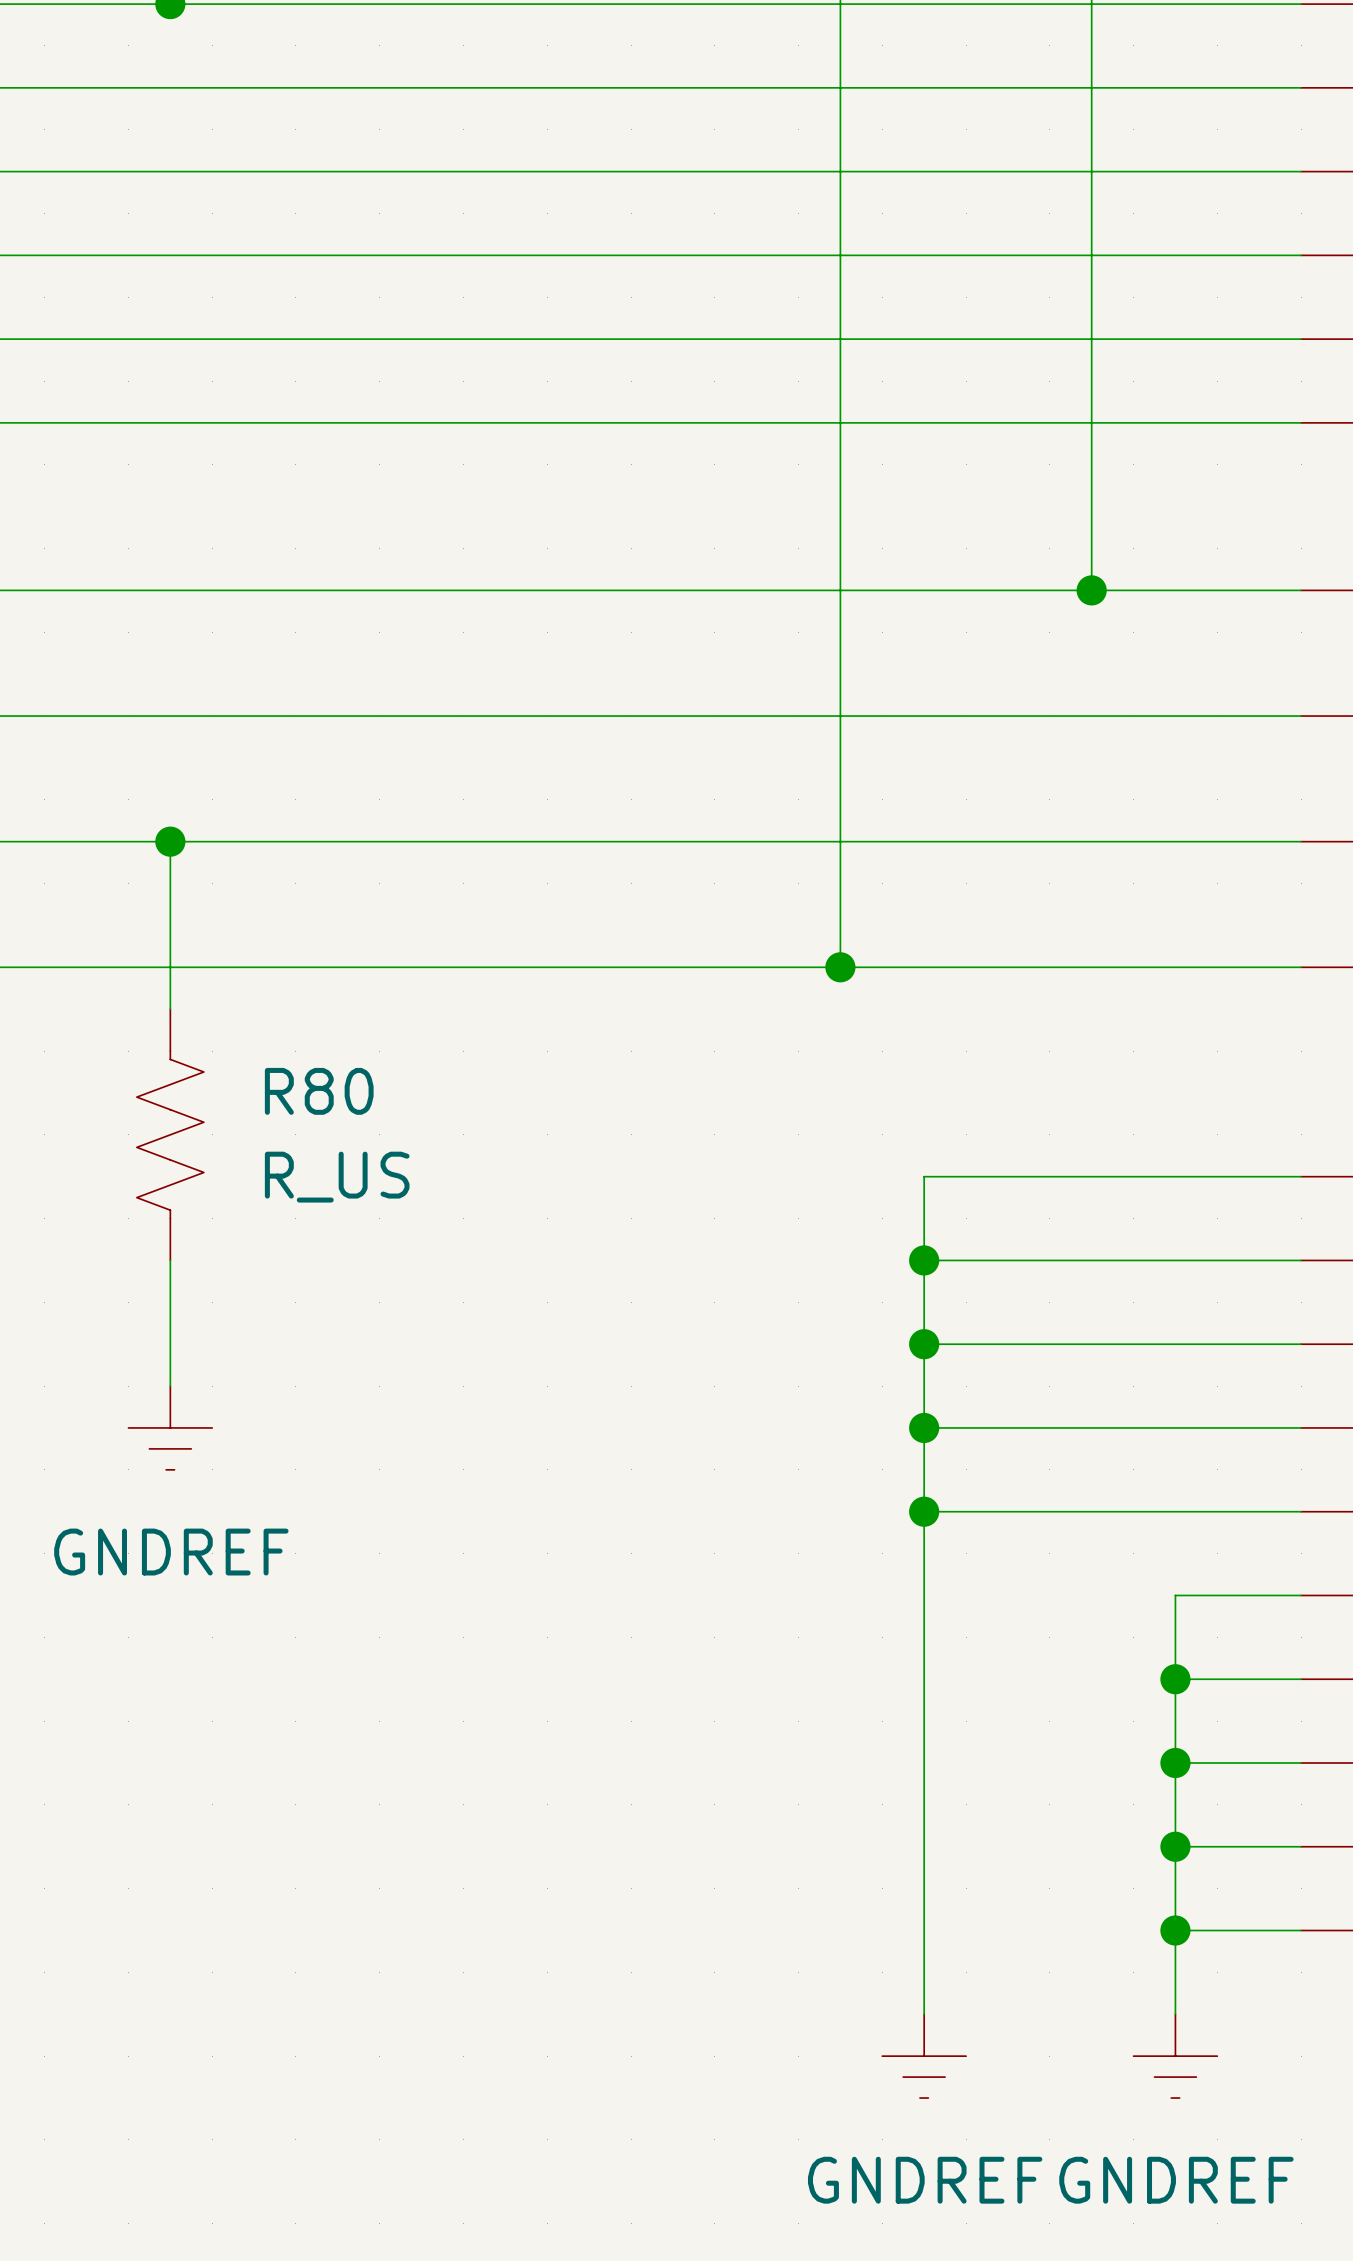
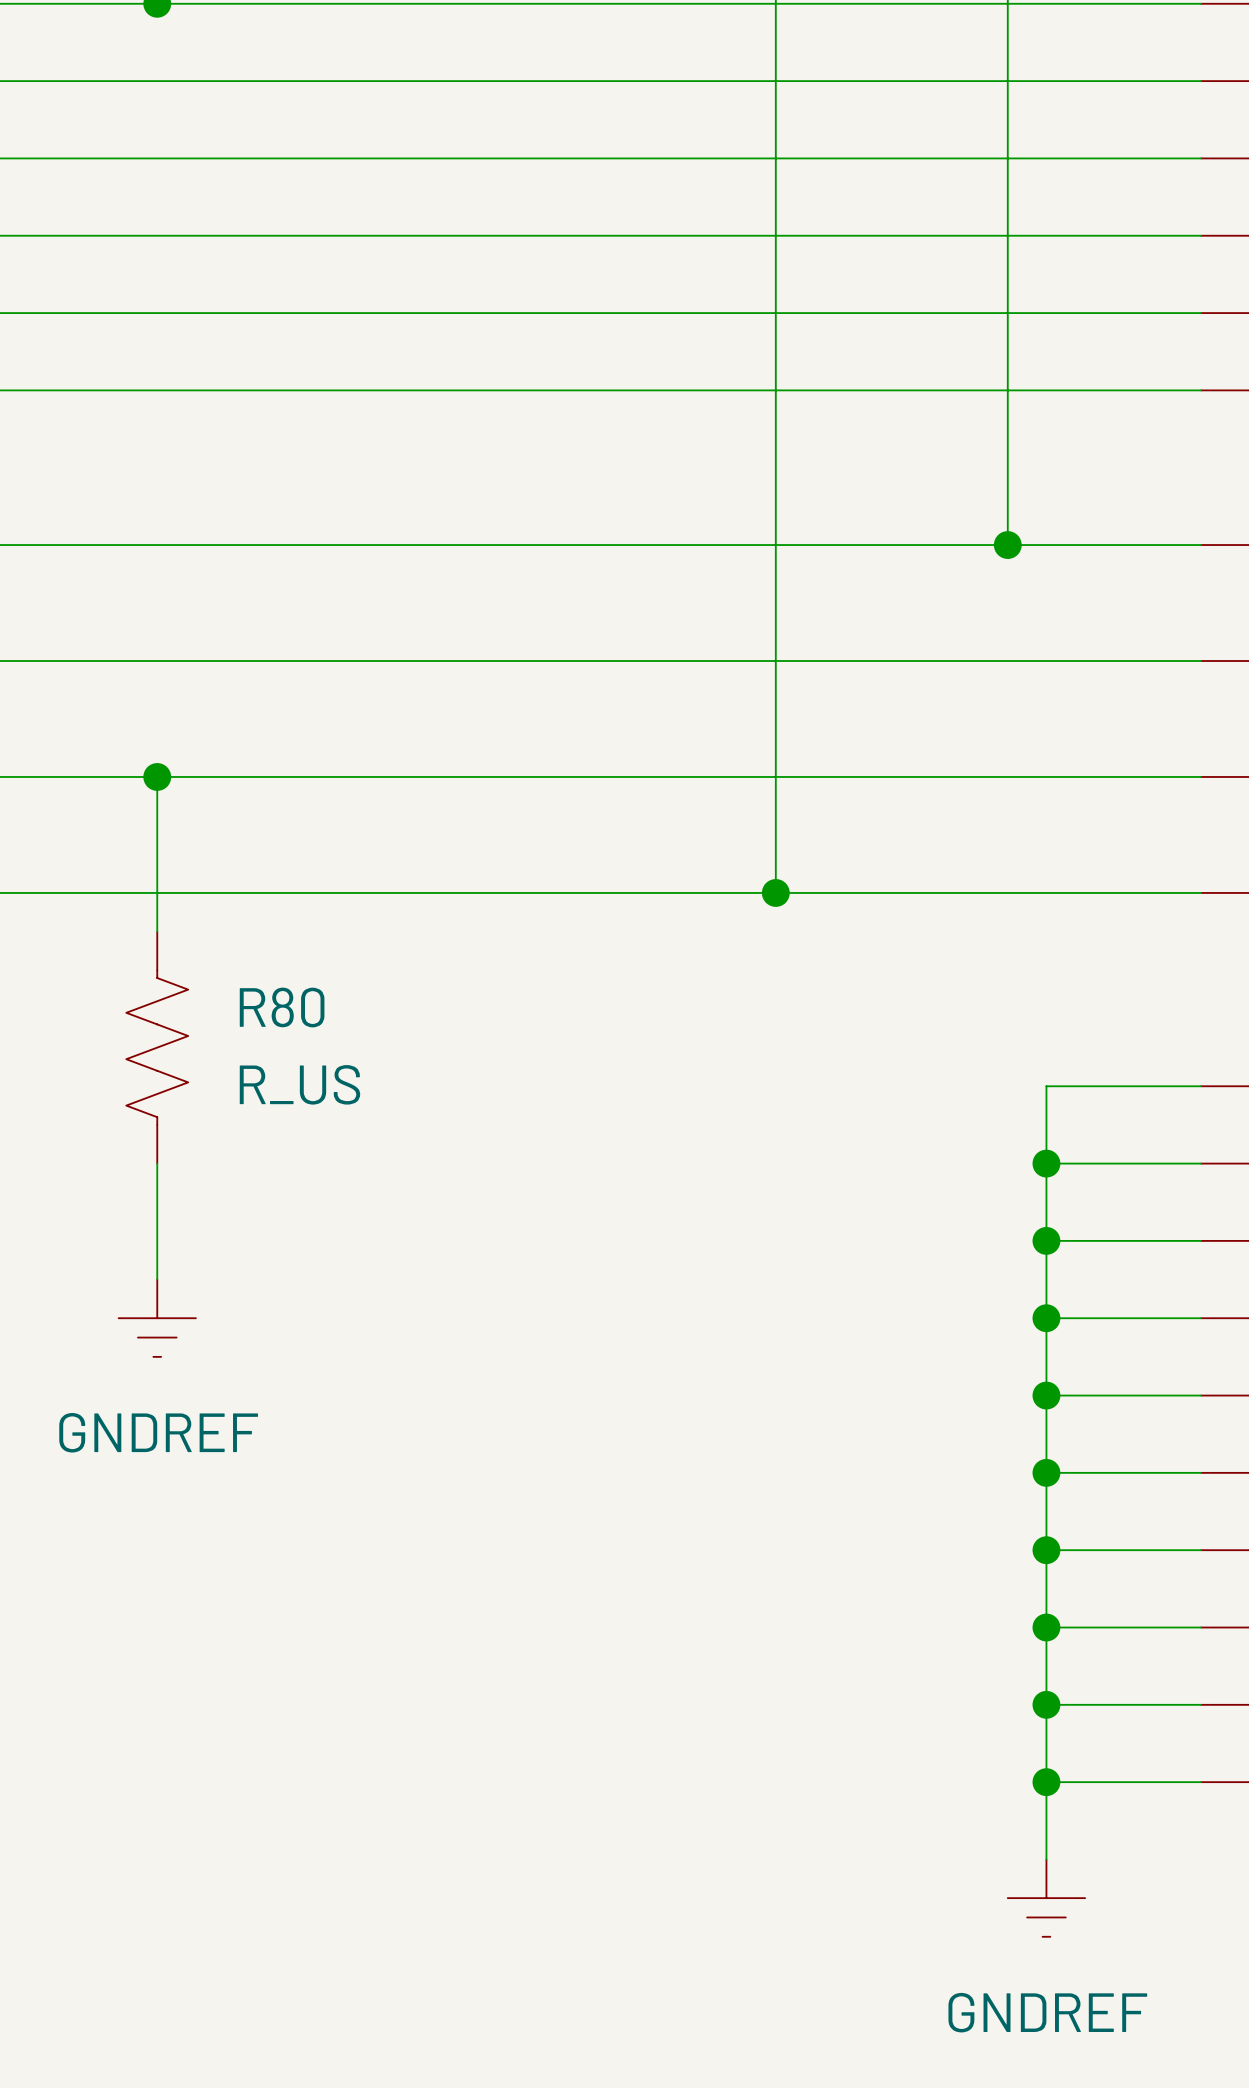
wire: (1133, 1176) (924, 1176) (924, 2014) -> (1046, 1086) (1046, 1859)
wire: (924, 1260) (1133, 1260) -> none
junction: (924, 1260) -> none
junction: none -> (1046, 1163)
wire: (924, 1344) (1133, 1344) -> none
junction: (924, 1344) -> none
junction: none -> (1046, 1240)
wire: (924, 1427) (1133, 1427) -> none
junction: (924, 1427) -> none
junction: none -> (1046, 1318)
wire: (924, 1511) (1133, 1511) -> none
junction: (924, 1511) -> none
junction: none -> (1046, 1395)
junction: none -> (1046, 1472)
wire: (1175, 1595) (1175, 2014) -> (1085, 1472) (1046, 1472)
wire: none -> (1046, 1550) (1085, 1550)
junction position: (1175, 1679) -> (1046, 1550)
wire: none -> (1046, 1627) (1085, 1627)
junction position: (1175, 1762) -> (1046, 1627)
wire: none -> (1046, 1704) (1085, 1704)
junction position: (1175, 1846) -> (1046, 1704)
wire: none -> (1046, 1782) (1085, 1782)
junction position: (1175, 1930) -> (1046, 1782)
power symbol: GNDREF (924, 2056) -> none
power symbol position: GNDREF (1175, 2056) -> GNDREF (1046, 1898)

